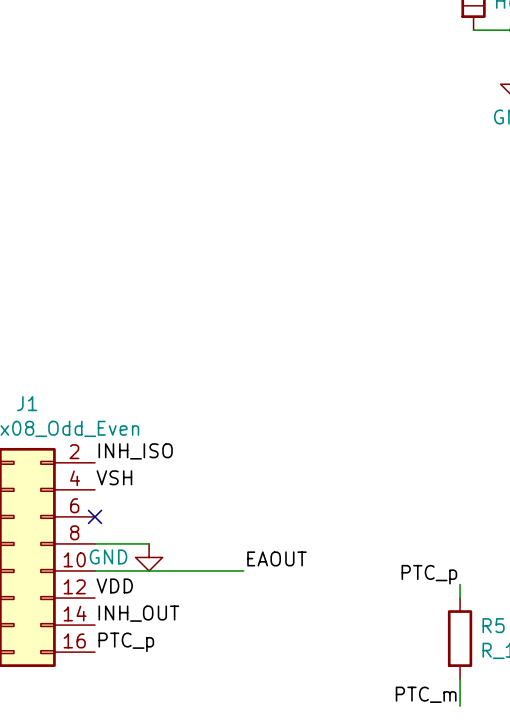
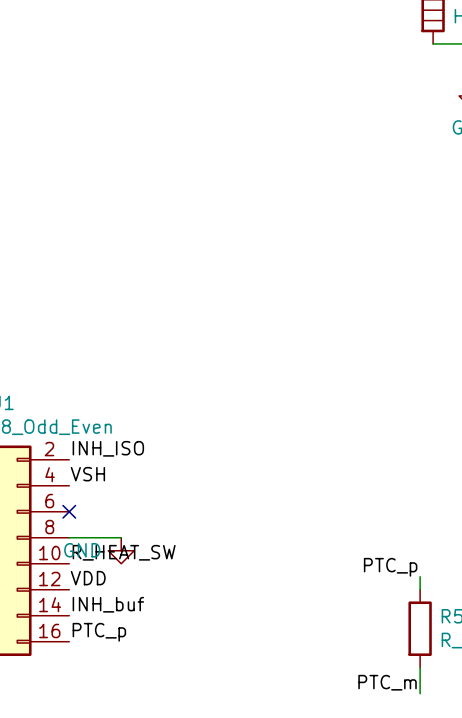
label: EAOUT (276, 558) -> none
label: none -> R_HEAT_SW (124, 552)
wire: (94, 570) (243, 570) -> none
label: INH_OUT (138, 613) -> INH_buf (108, 604)

